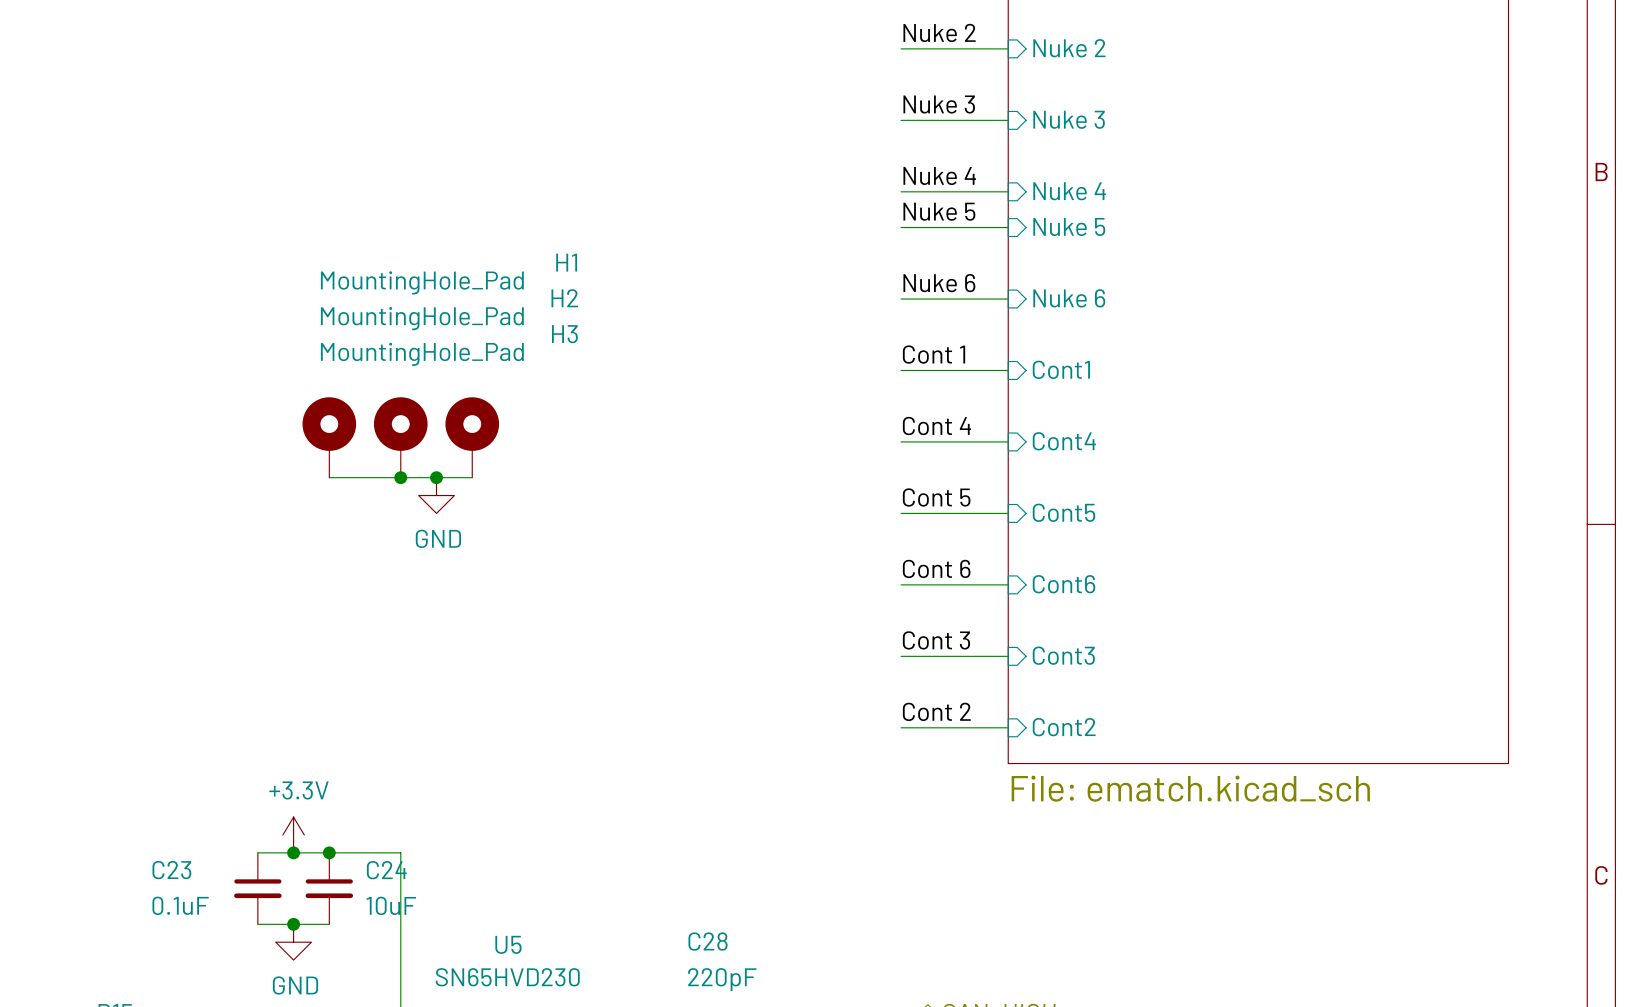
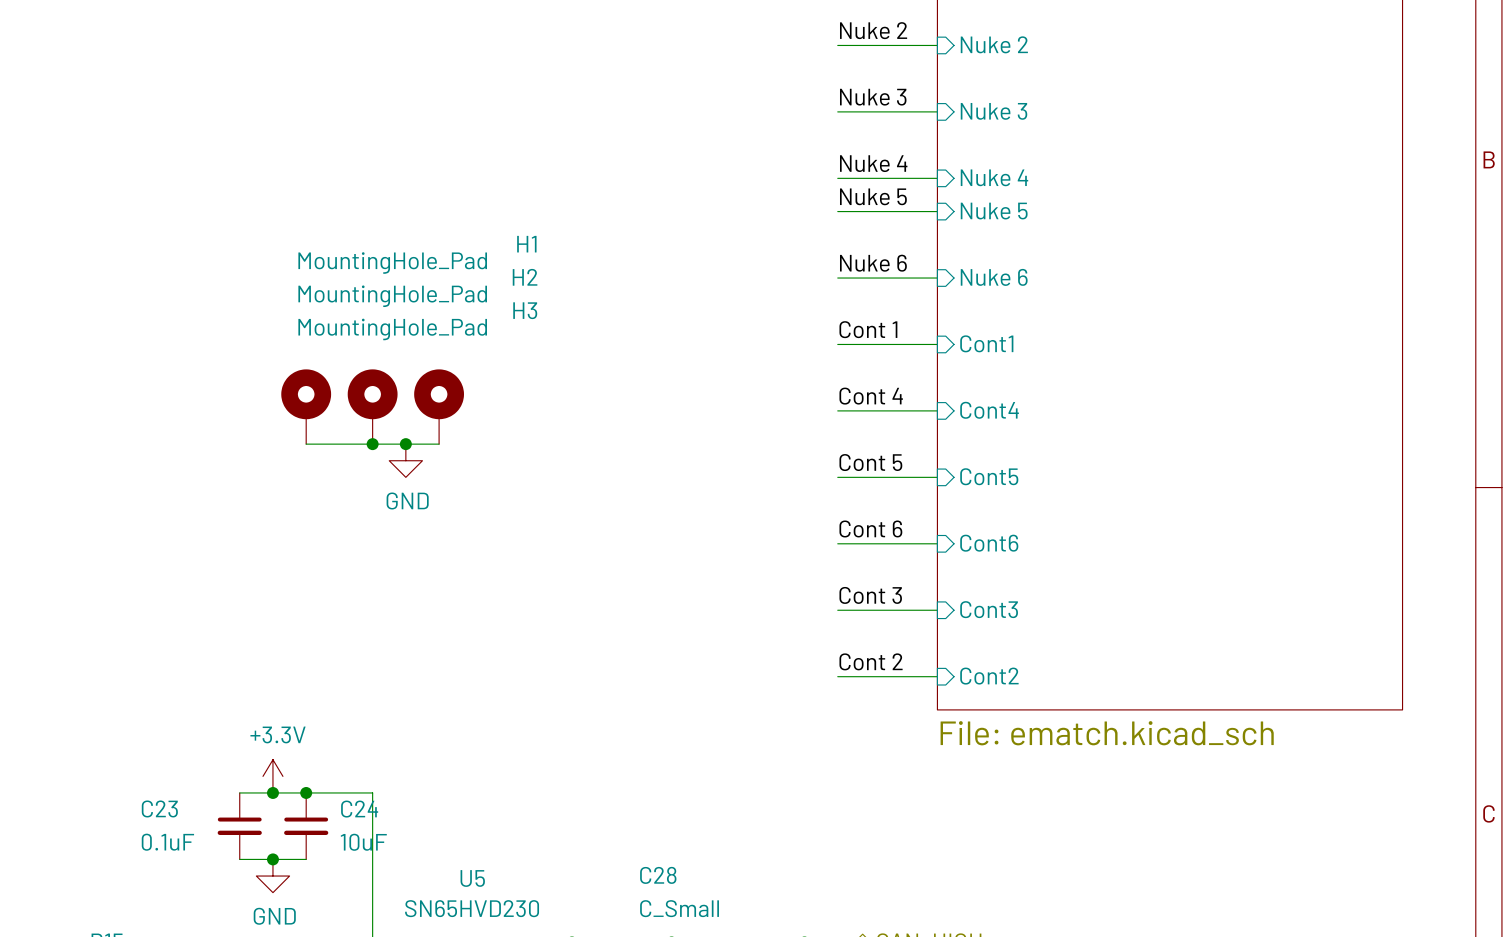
C28 value: 220pF (722, 979) -> C_Small (679, 908)

